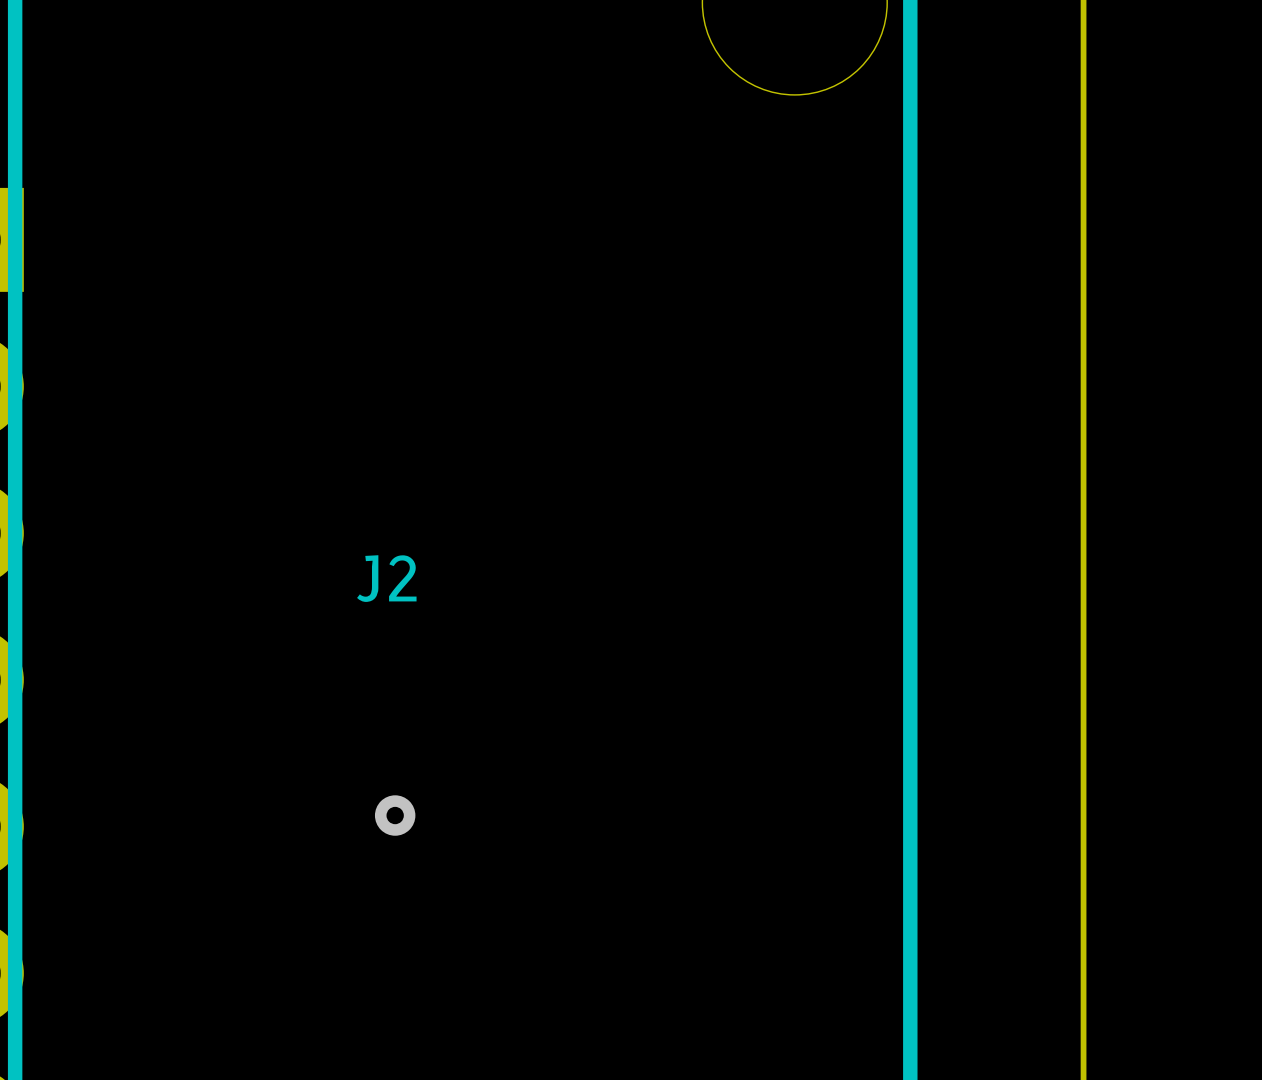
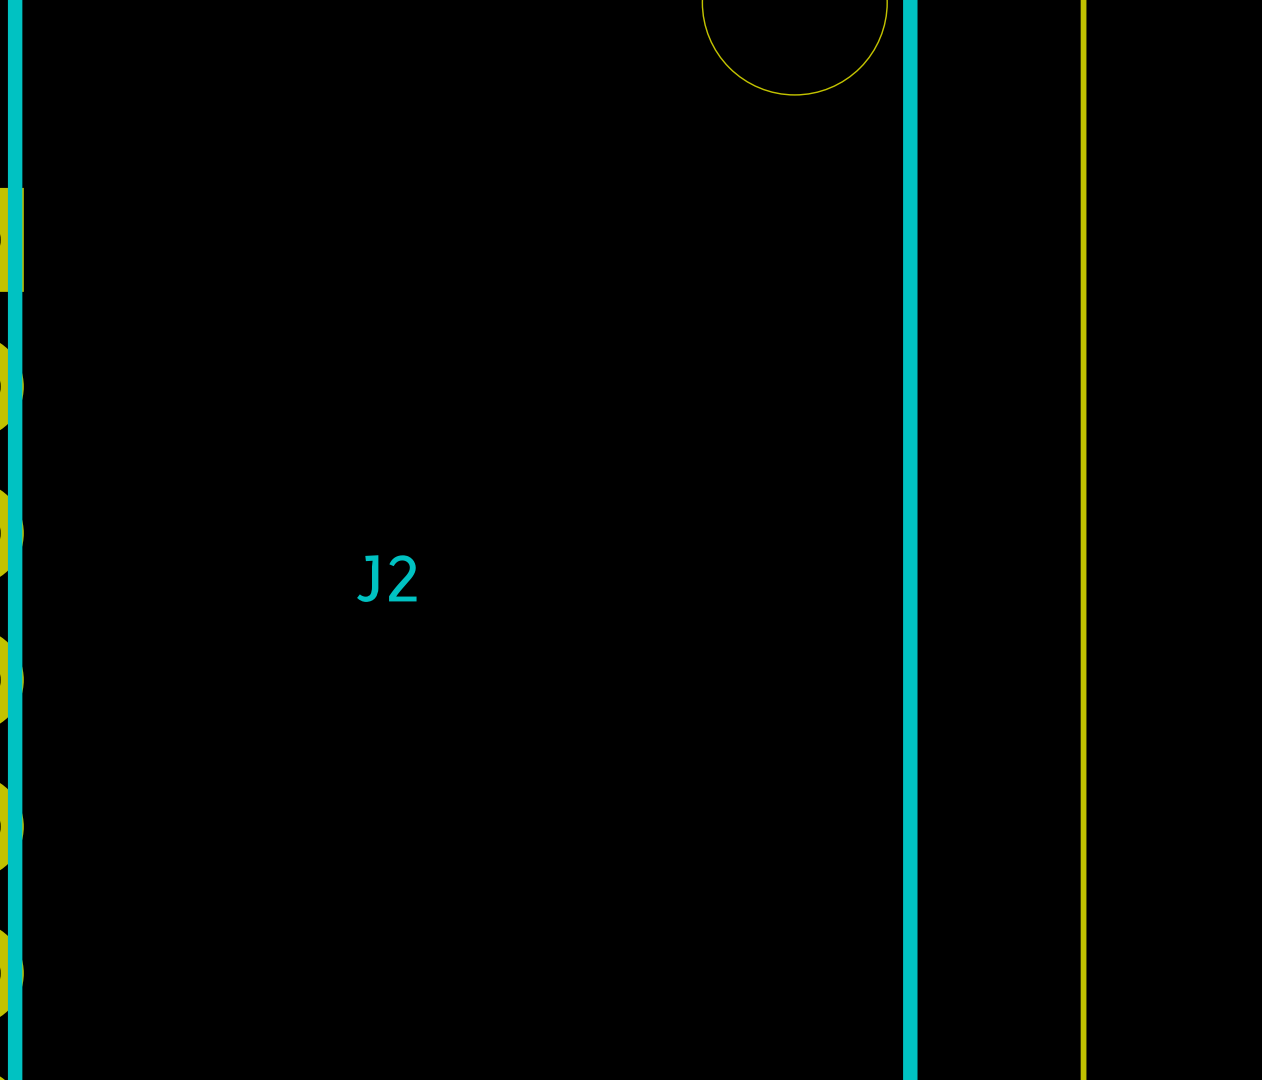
via: (395, 815) -> none

